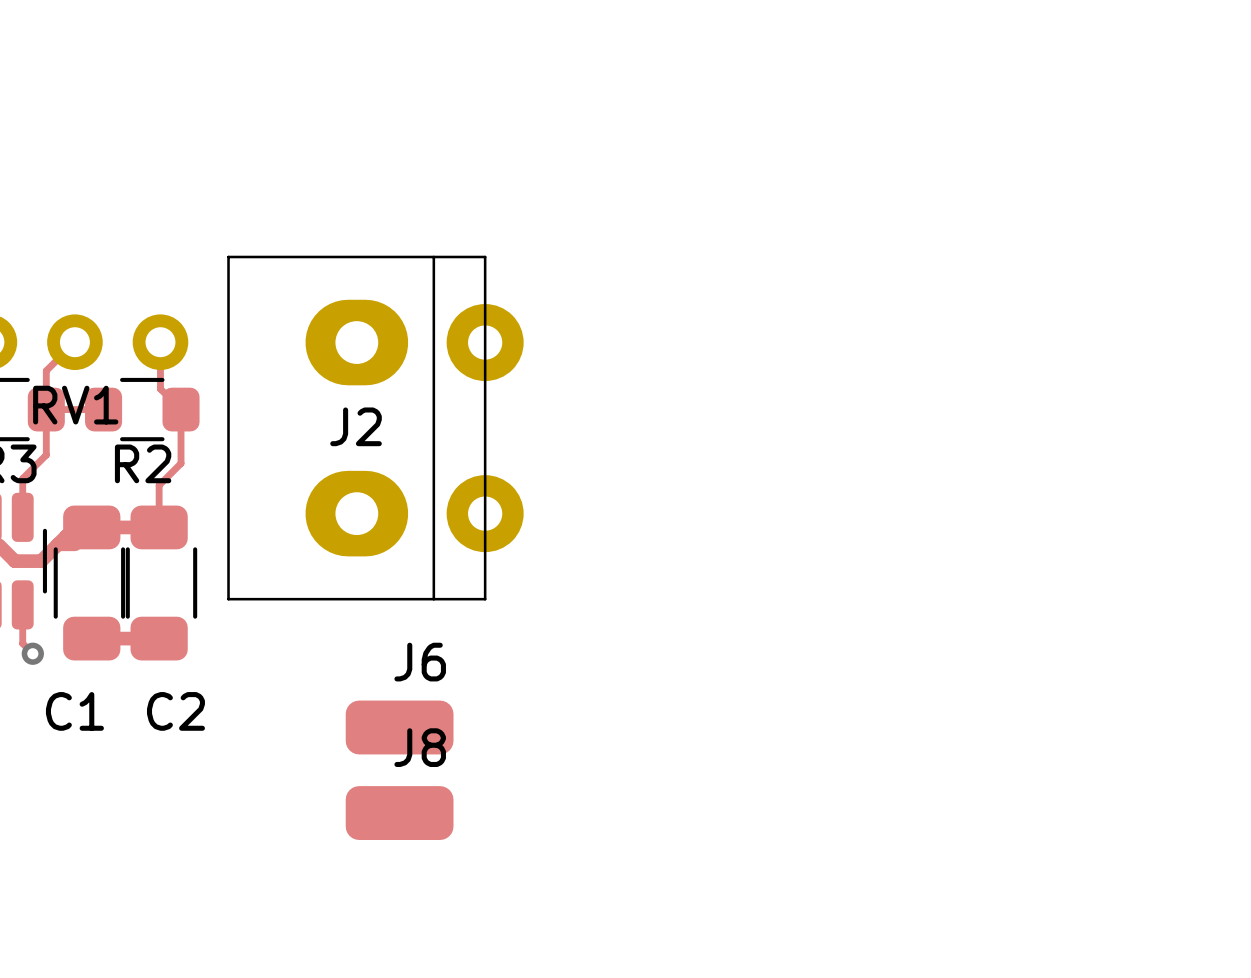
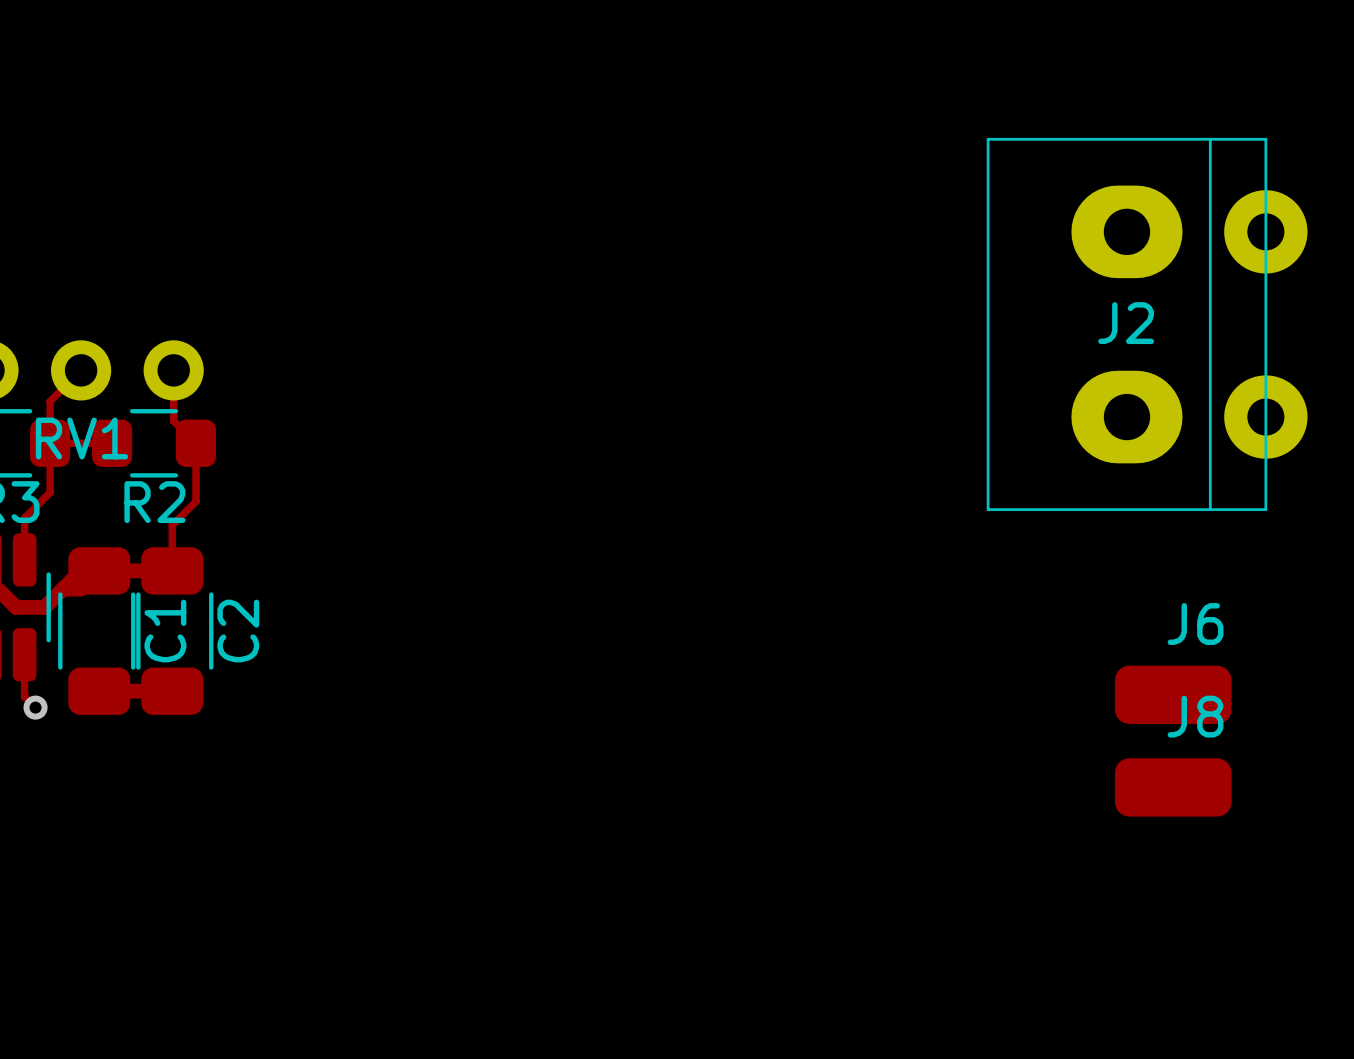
J2 position: (375, 428) -> (1147, 324)
C1 name rotation: 0° (74, 711) -> 90° counterclockwise (165, 631)
C1 name position: C1 (74, 711) -> C1 (165, 631)
C2 name rotation: 0° (175, 711) -> 90° counterclockwise (238, 631)
C2 name position: C2 (175, 711) -> C2 (238, 631)
J6 position: (399, 727) -> (1173, 694)
J8 position: (399, 813) -> (1173, 787)

